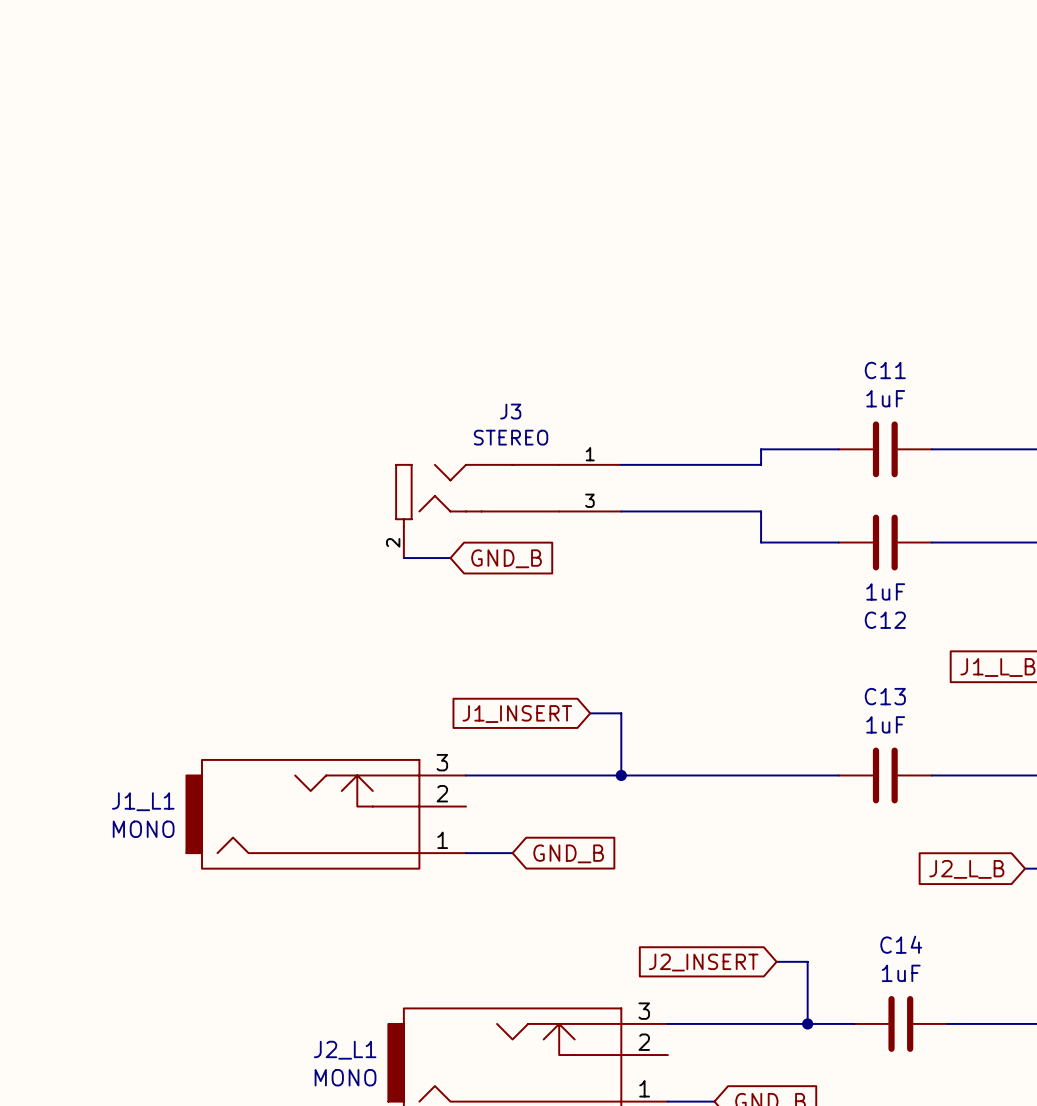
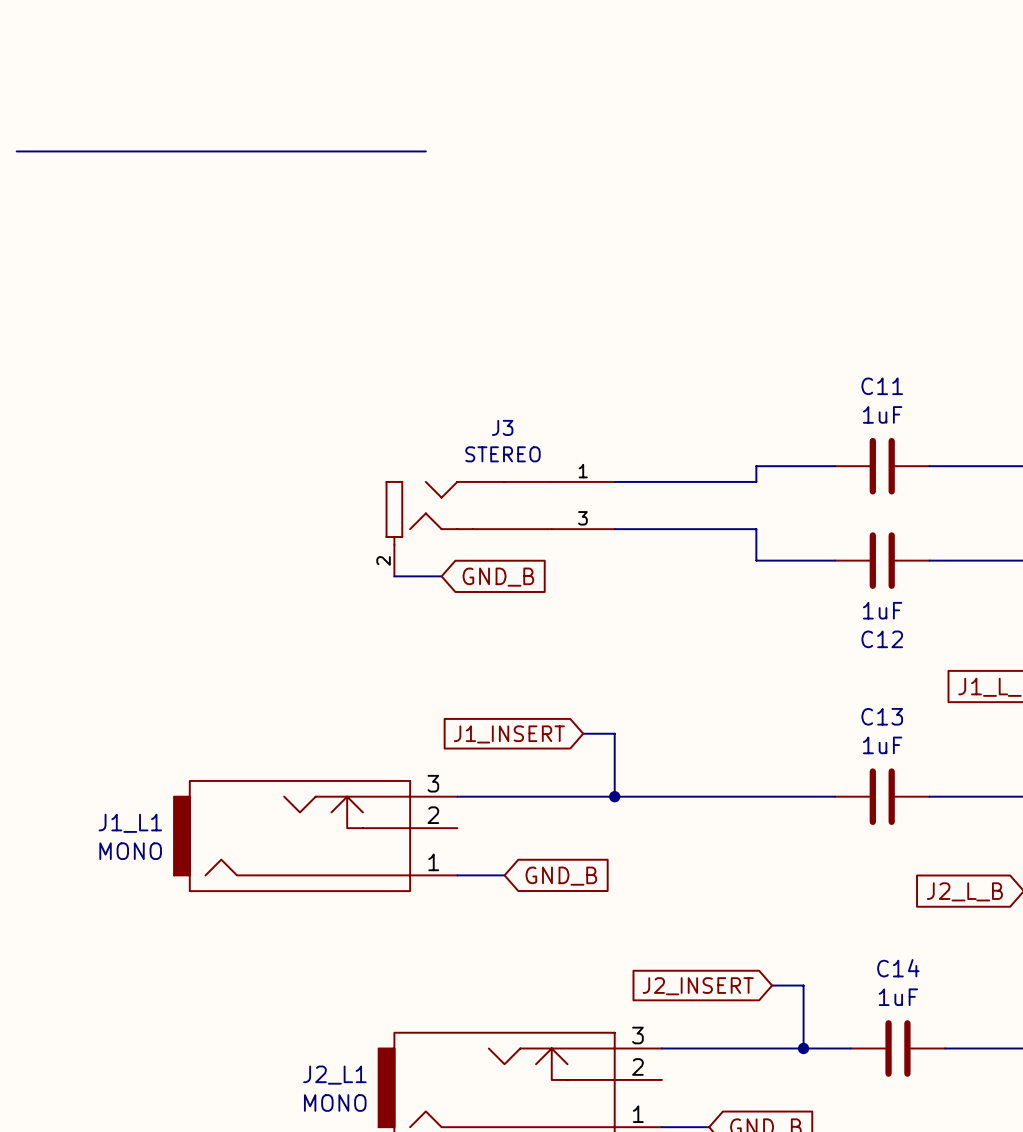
wire: none -> (16, 151) (425, 151)

